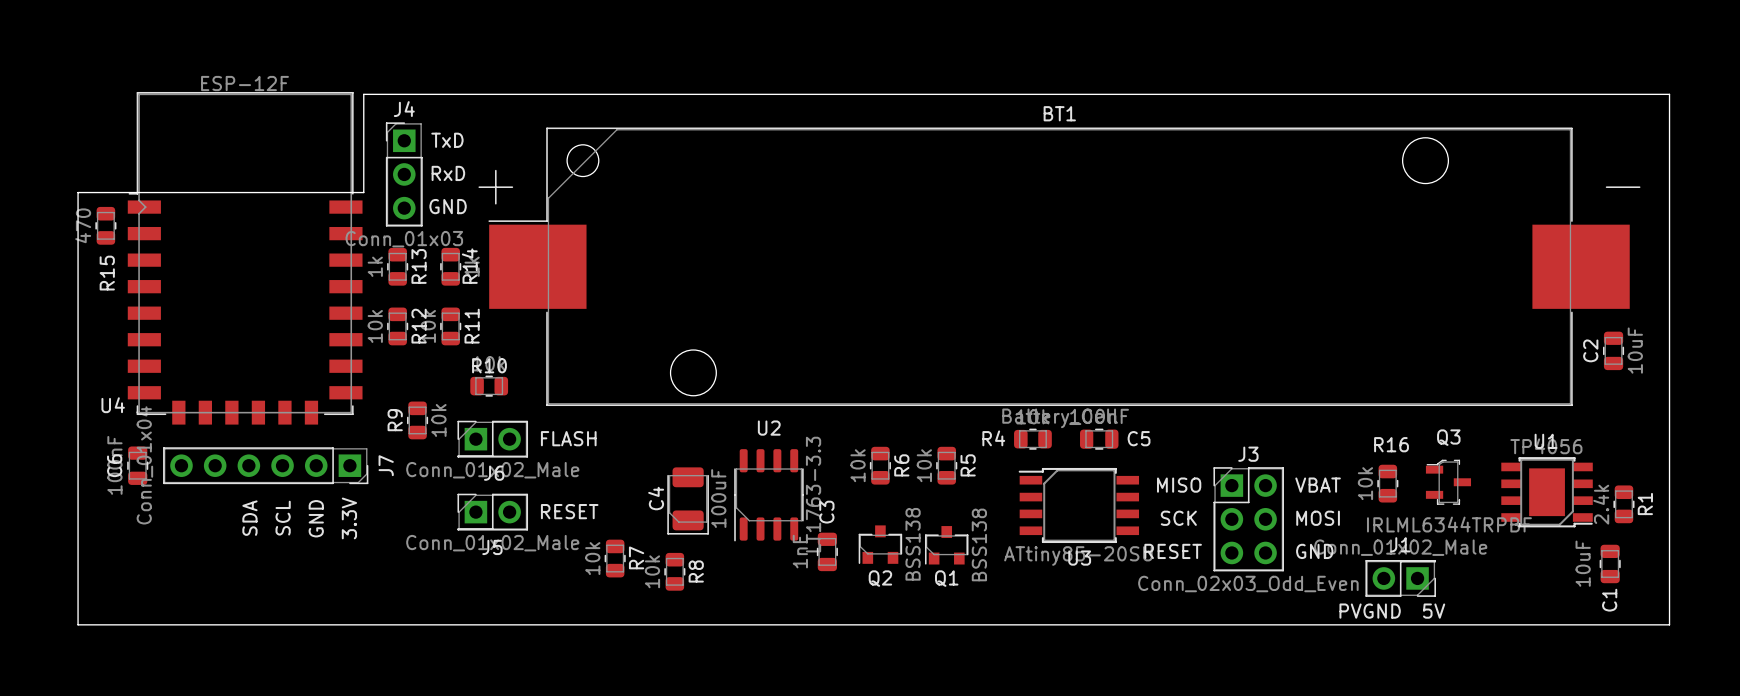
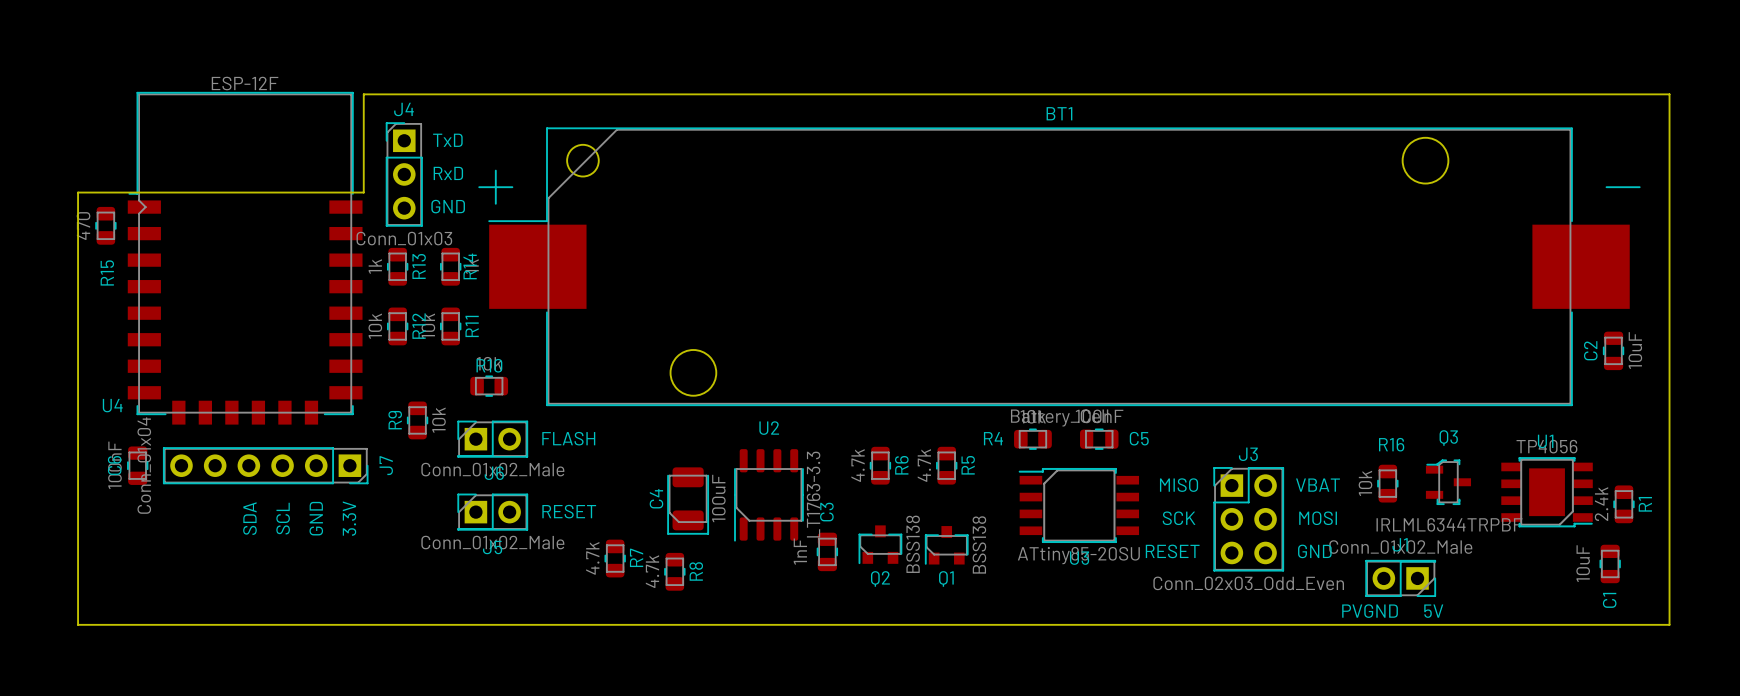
R6 value: 10k (858, 465) -> 4.7k (858, 465)
R5 value: 10k (924, 465) -> 4.7k (924, 465)
R7 value: 10k (592, 558) -> 4.7k (592, 558)
R8 value: 10k (652, 571) -> 4.7k (652, 571)

